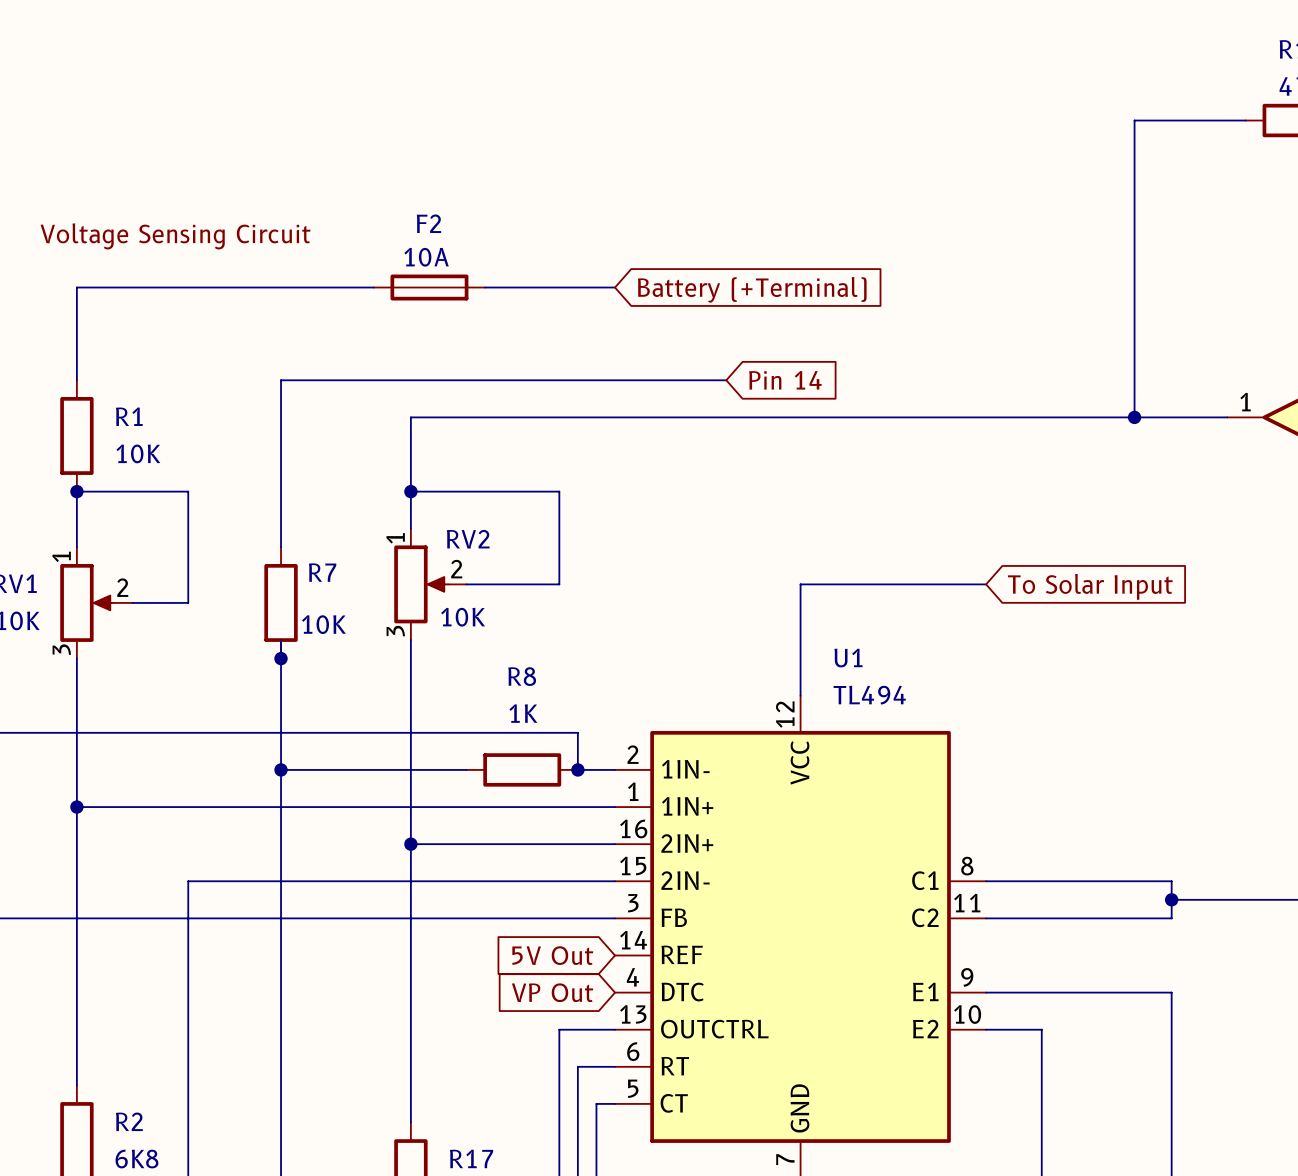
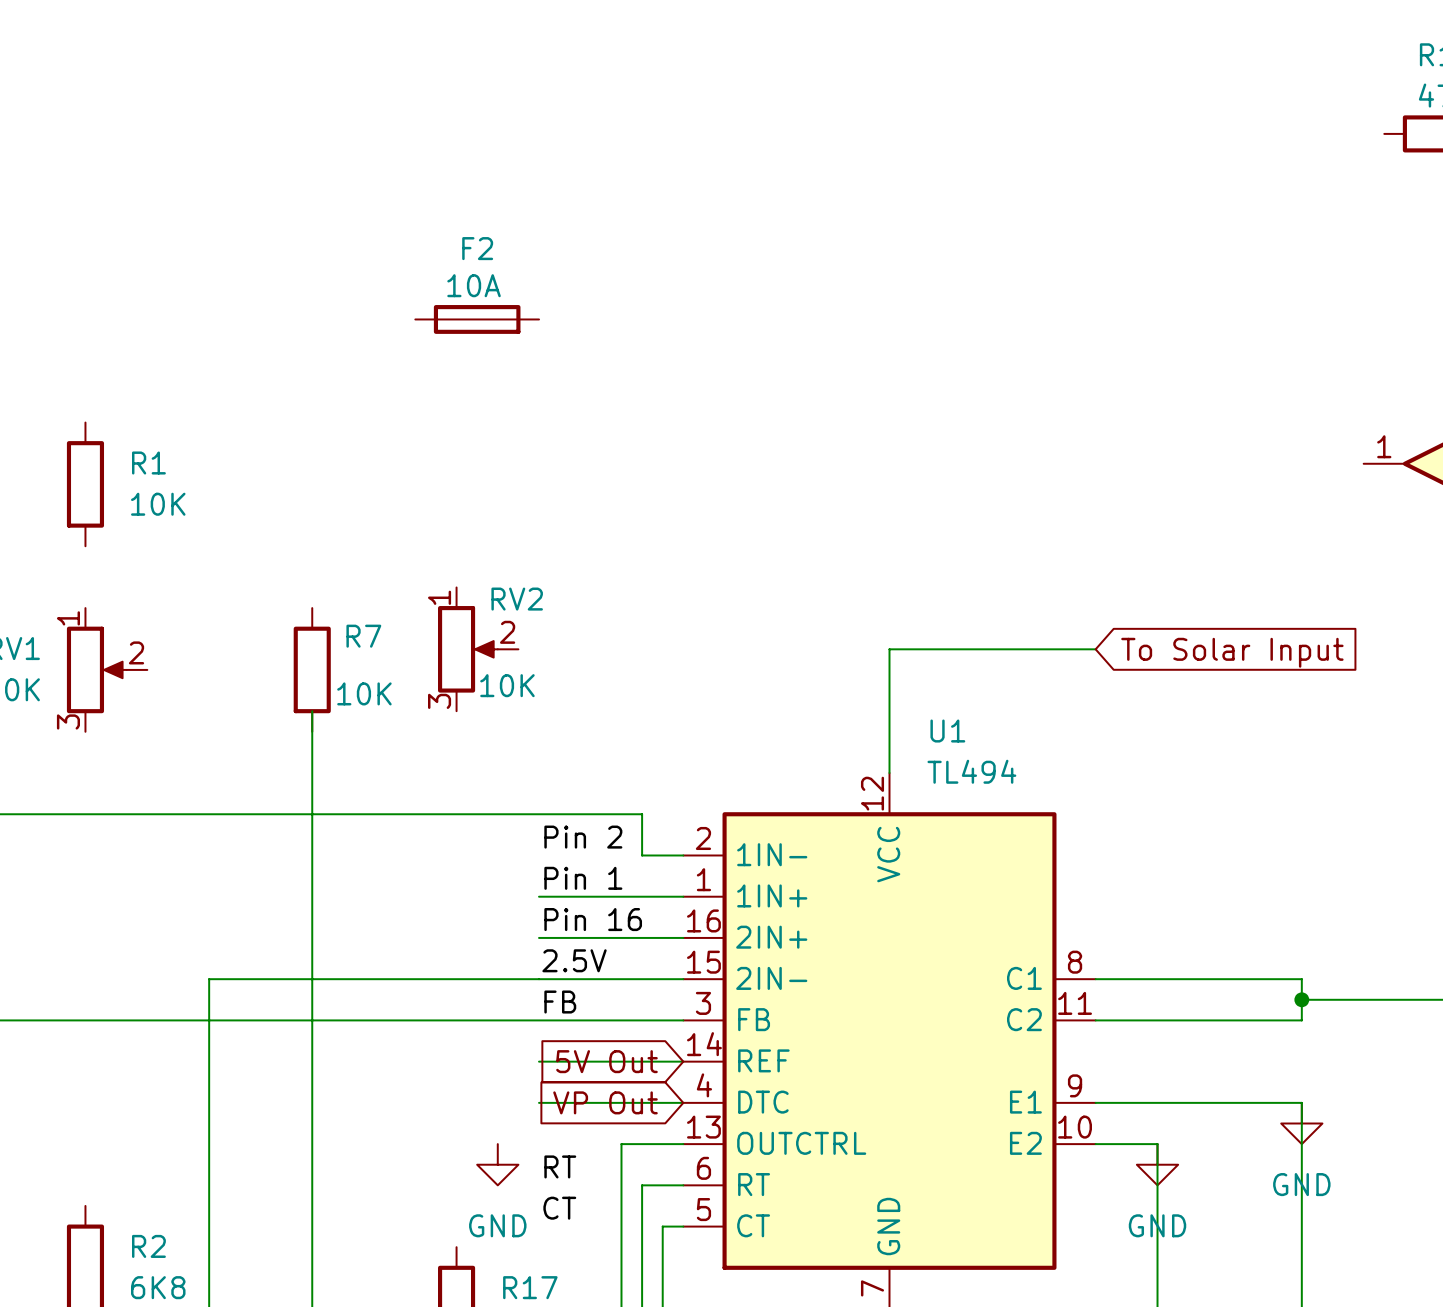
wire: (1245, 120) (1134, 120) (1134, 417) -> none
label: Voltage Sensing Circuit (175, 236) -> none
wire: (373, 287) (76, 287) (76, 380) -> none
wire: (485, 287) (615, 287) -> none
global label: Battery (+Terminal) (752, 289) -> none
wire: (726, 380) (281, 380) (281, 547) -> none
global label: Pin 14 (785, 380) -> none
junction: (1134, 417) -> none
wire: (1227, 417) (410, 417) (410, 528) -> none
junction: (76, 491) -> none
wire: (410, 491) (559, 491) (559, 584) (466, 584) -> none
junction: (410, 491) -> none
wire: (76, 547) (76, 491) (188, 491) (188, 602) (132, 602) -> none
wire: (410, 640) (410, 1122) -> none
wire: (76, 658) (76, 1085) -> none
junction: (281, 658) -> none
label: none -> Pin 2 (583, 837)
wire: (281, 769) (466, 769) -> none
junction: (281, 769) -> none
R8: 1K (522, 769) -> none
junction: (577, 769) -> none
label: none -> Pin 1 (583, 878)
wire: (76, 807) (485, 807) -> none
junction: (76, 807) -> none
label: none -> Pin 16 (593, 919)
wire: (410, 844) (485, 844) -> none
junction: (410, 844) -> none
label: none -> 2.5V (574, 960)
label: none -> FB (560, 1002)
wire: none -> (539, 1061) (683, 1061)
wire: none -> (539, 1102) (683, 1102)
power symbol: none -> GND (1301, 1123)
power symbol: none -> GND (497, 1164)
power symbol: none -> GND (1157, 1164)
label: none -> RT (560, 1166)
label: none -> CT (559, 1208)

